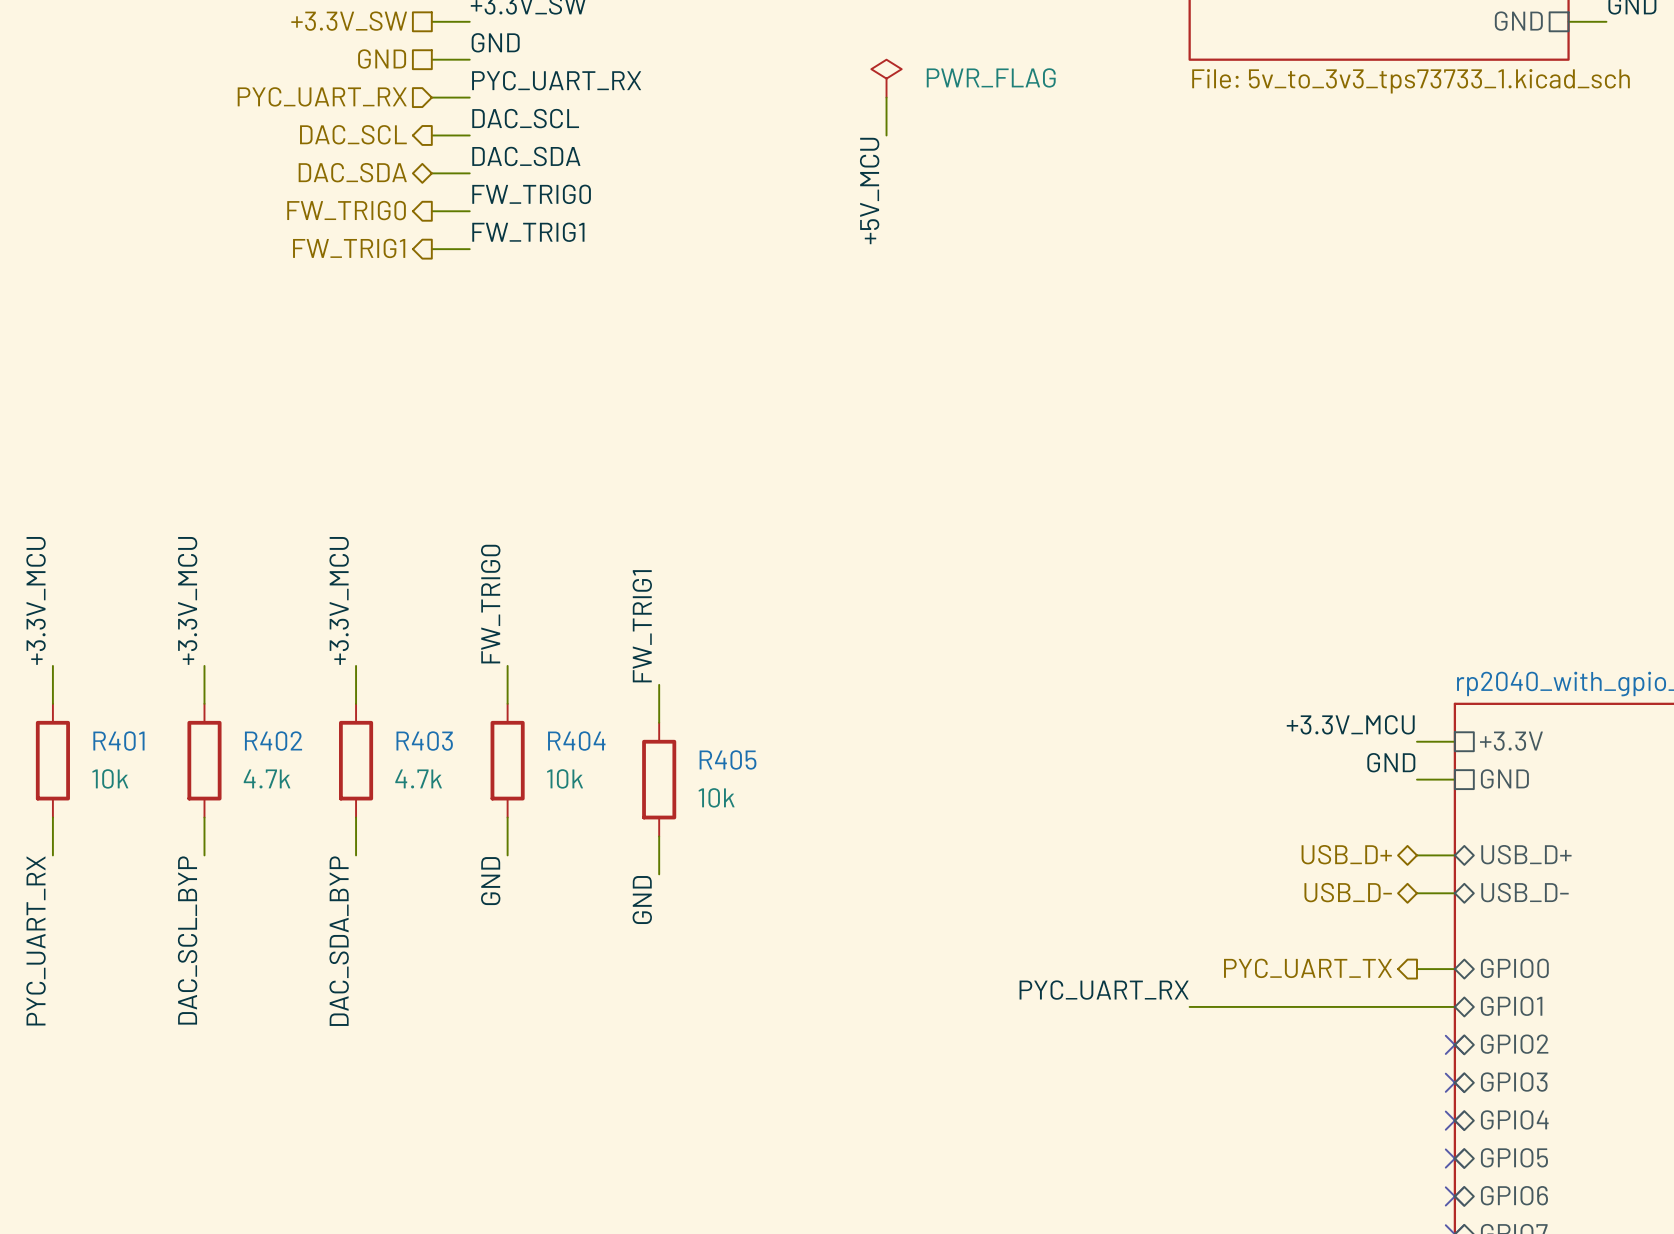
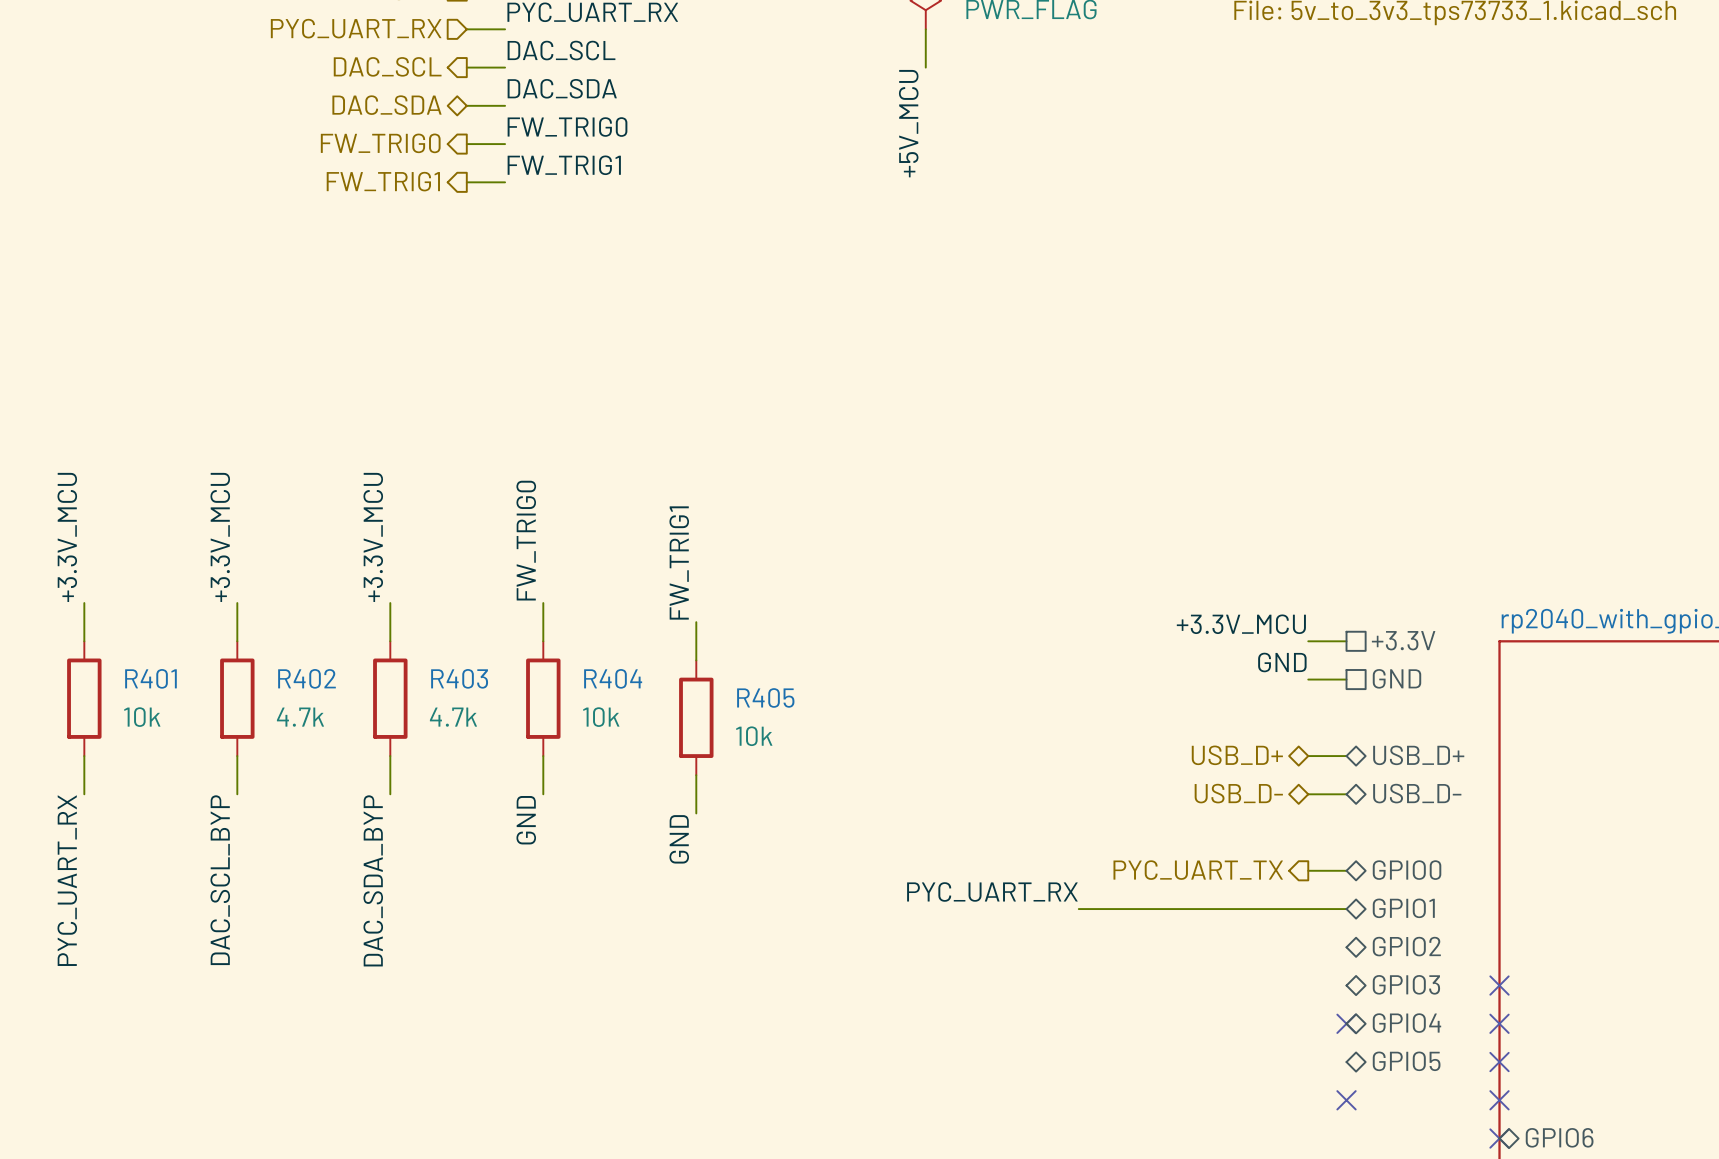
label position: +3.3V_MCU (1350, 724) -> +3.3V_MCU (1241, 624)
wire: (1416, 741) (1454, 741) -> (1308, 641) (1346, 641)
sheet pin position: +3.3V (1511, 741) -> +3.3V (1403, 640)
label position: GND (1391, 762) -> GND (1282, 662)
sheet pin position: GND (1504, 778) -> GND (1396, 678)
wire: (1416, 779) (1454, 779) -> (1308, 679) (1346, 679)
hierarchical label position: USB_D+ (1346, 854) -> USB_D+ (1237, 755)
sheet pin position: USB_D+ (1526, 854) -> USB_D+ (1418, 755)
wire: (1416, 855) (1454, 855) -> (1308, 756) (1346, 756)
hierarchical label position: USB_D- (1348, 892) -> USB_D- (1238, 793)
sheet pin position: USB_D- (1524, 892) -> USB_D- (1417, 793)
wire: (1416, 893) (1454, 893) -> (1308, 794) (1346, 794)
hierarchical label position: PYC_UART_TX (1307, 968) -> PYC_UART_TX (1198, 870)
sheet pin position: GPIO0 (1514, 968) -> GPIO0 (1407, 870)
wire: (1416, 969) (1454, 969) -> (1308, 870) (1346, 870)
label position: PYC_UART_RX (1104, 990) -> PYC_UART_RX (992, 891)
wire: (1189, 1006) (1454, 1006) -> (1078, 909) (1346, 909)
sheet pin position: GPIO1 (1511, 1006) -> GPIO1 (1403, 908)
sheet pin position: GPIO2 (1514, 1044) -> GPIO2 (1406, 946)
no-connect mark: none -> (1346, 1023)
sheet pin position: GPIO3 (1514, 1082) -> GPIO3 (1406, 984)
sheet pin position: GPIO4 (1514, 1119) -> GPIO4 (1406, 1023)
sheet pin position: GPIO5 (1514, 1157) -> GPIO5 (1406, 1061)
no-connect mark: none -> (1346, 1100)

